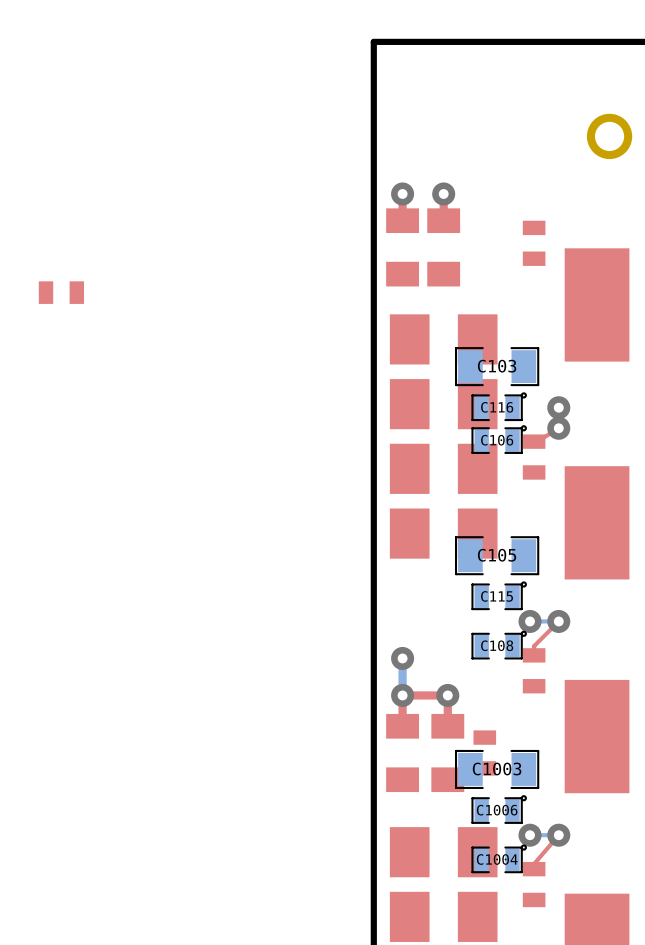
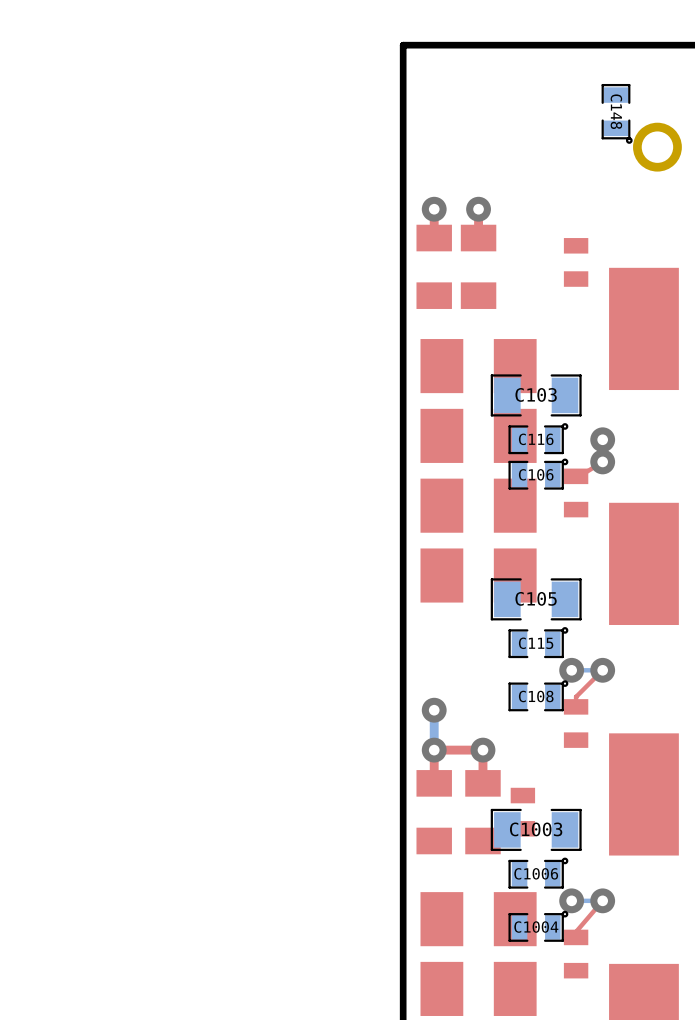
C148: none -> (617, 113)
part: (61, 292) -> none

